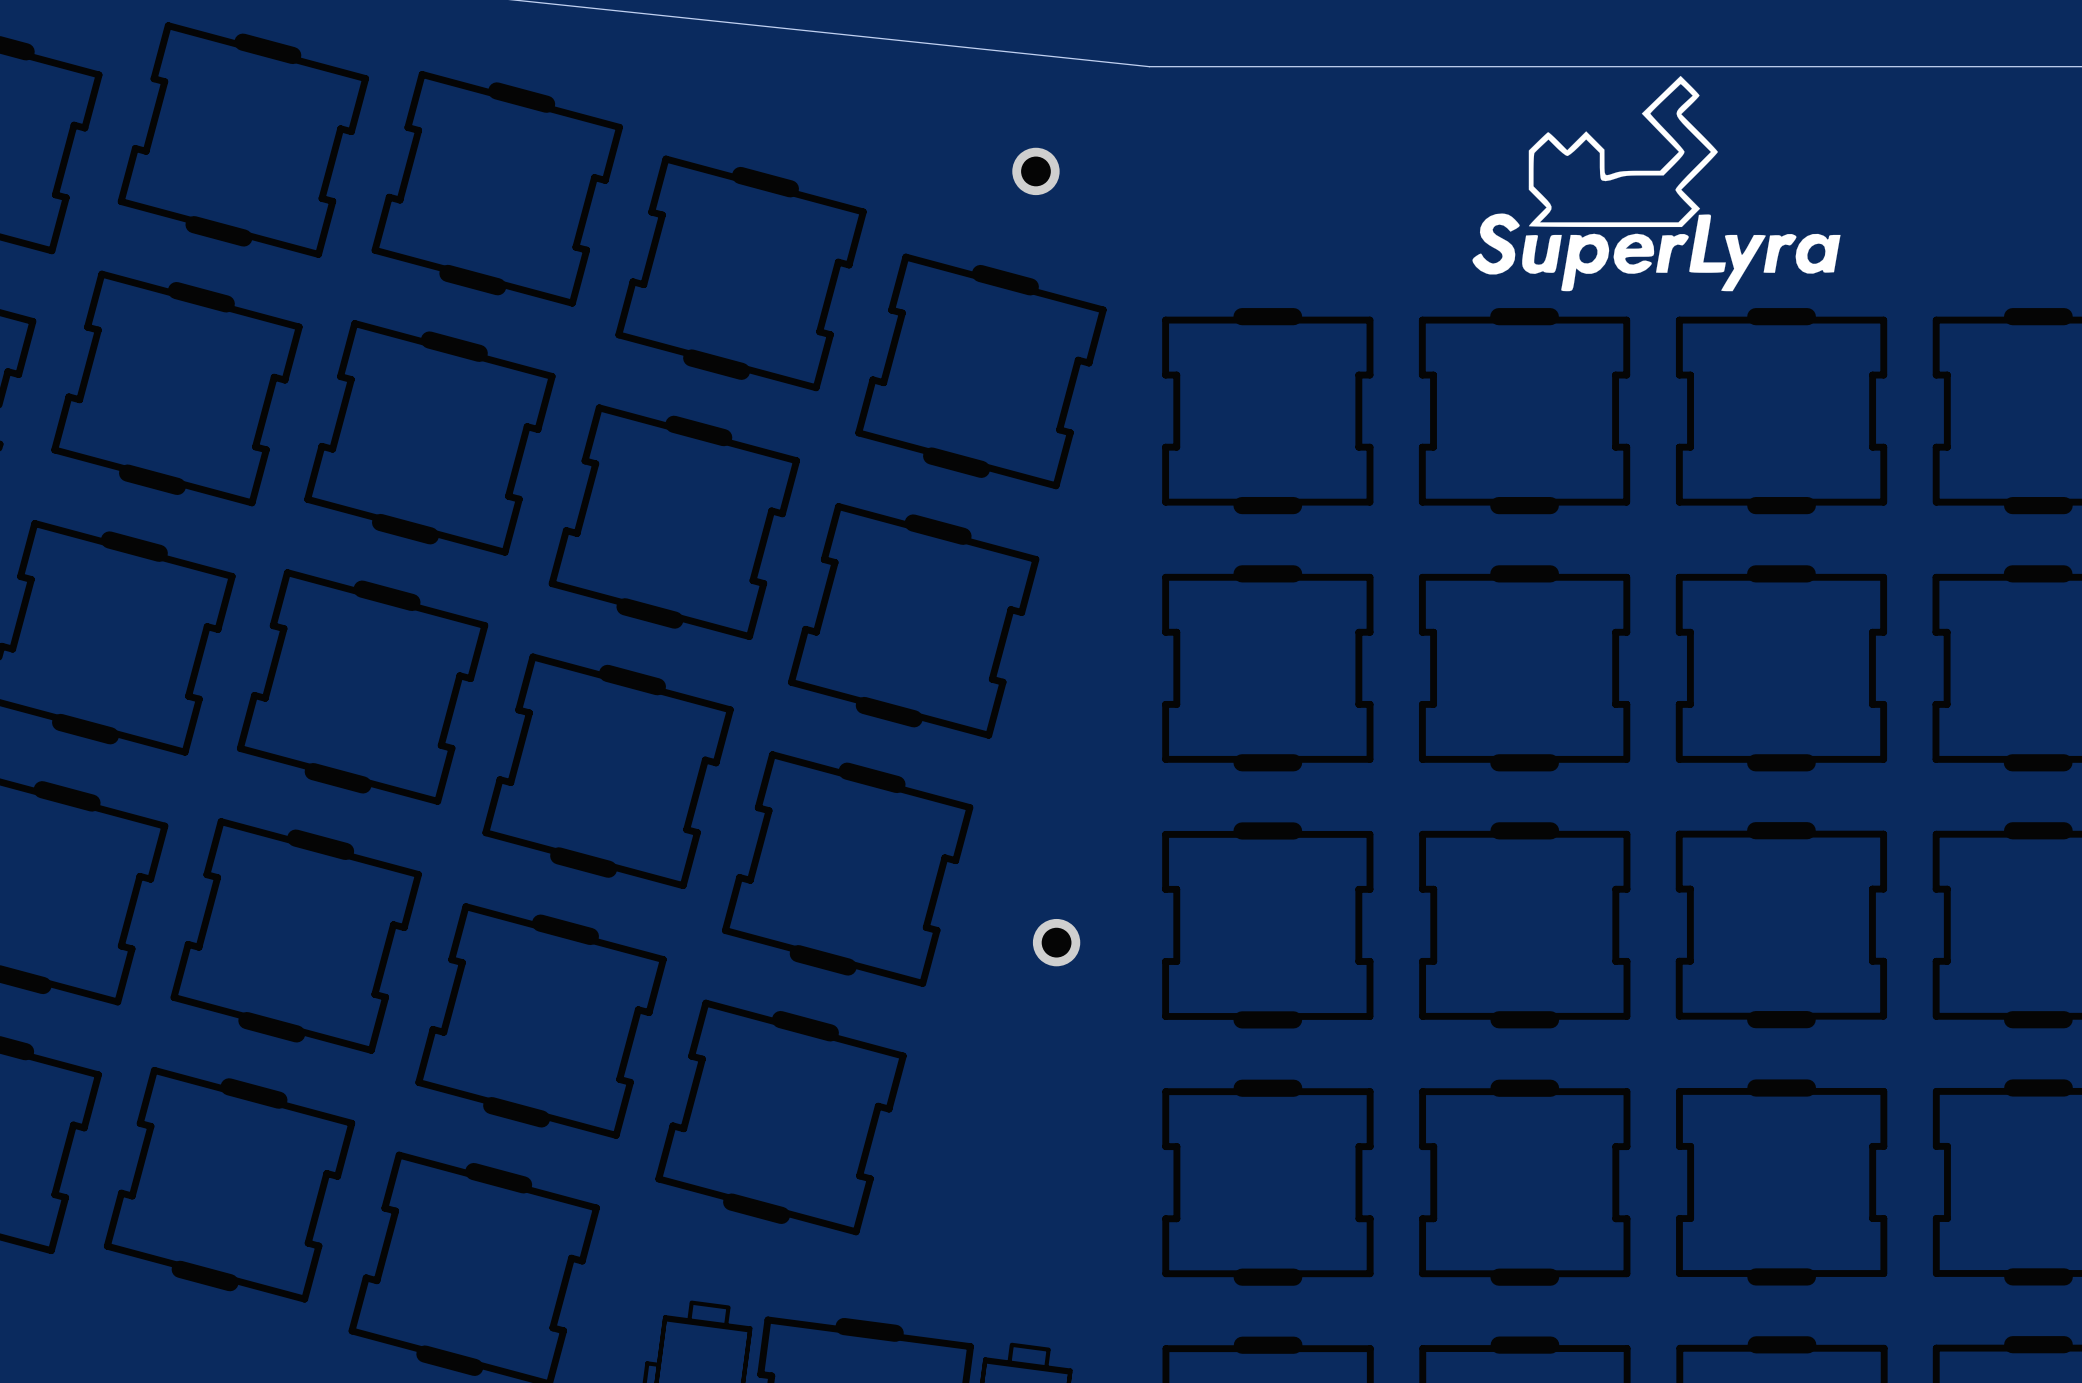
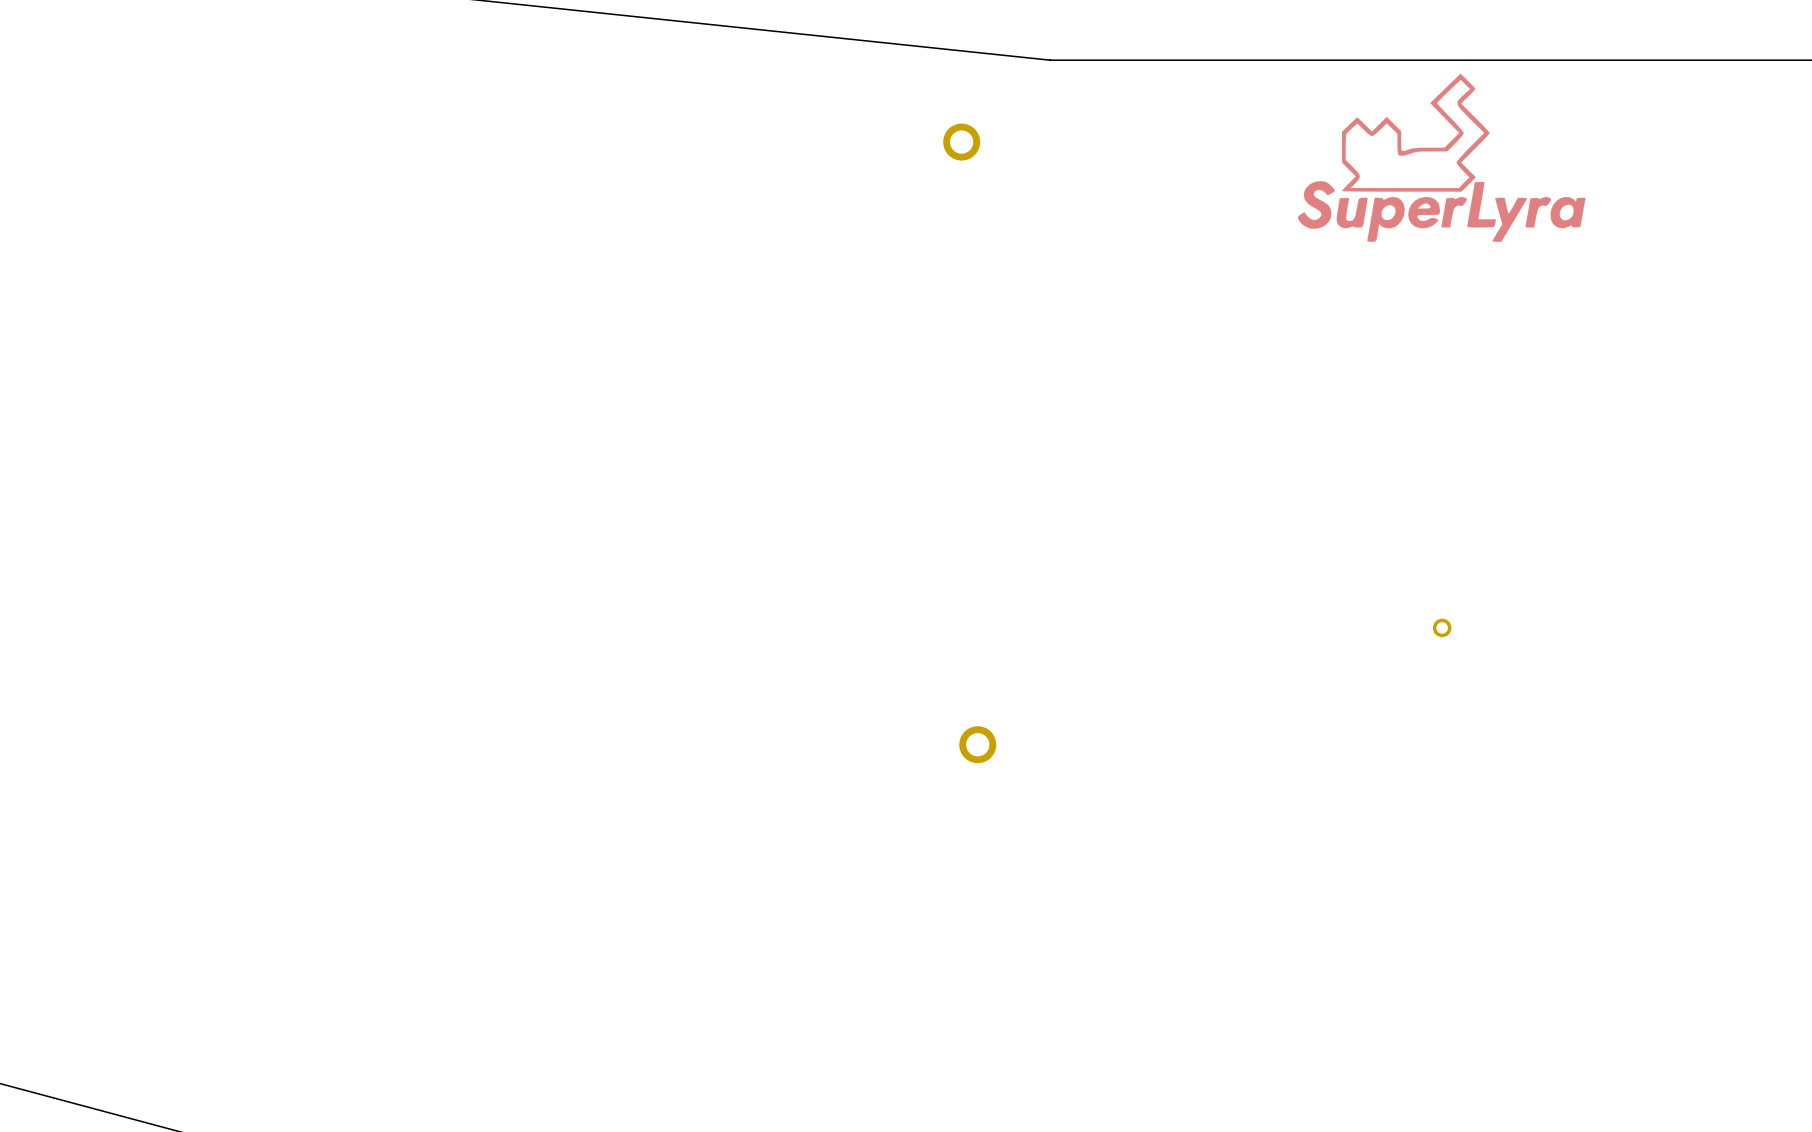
drawing: [1472, 75, 1841, 292] -> none
part: none -> (1441, 157)
part: none -> (1442, 627)

